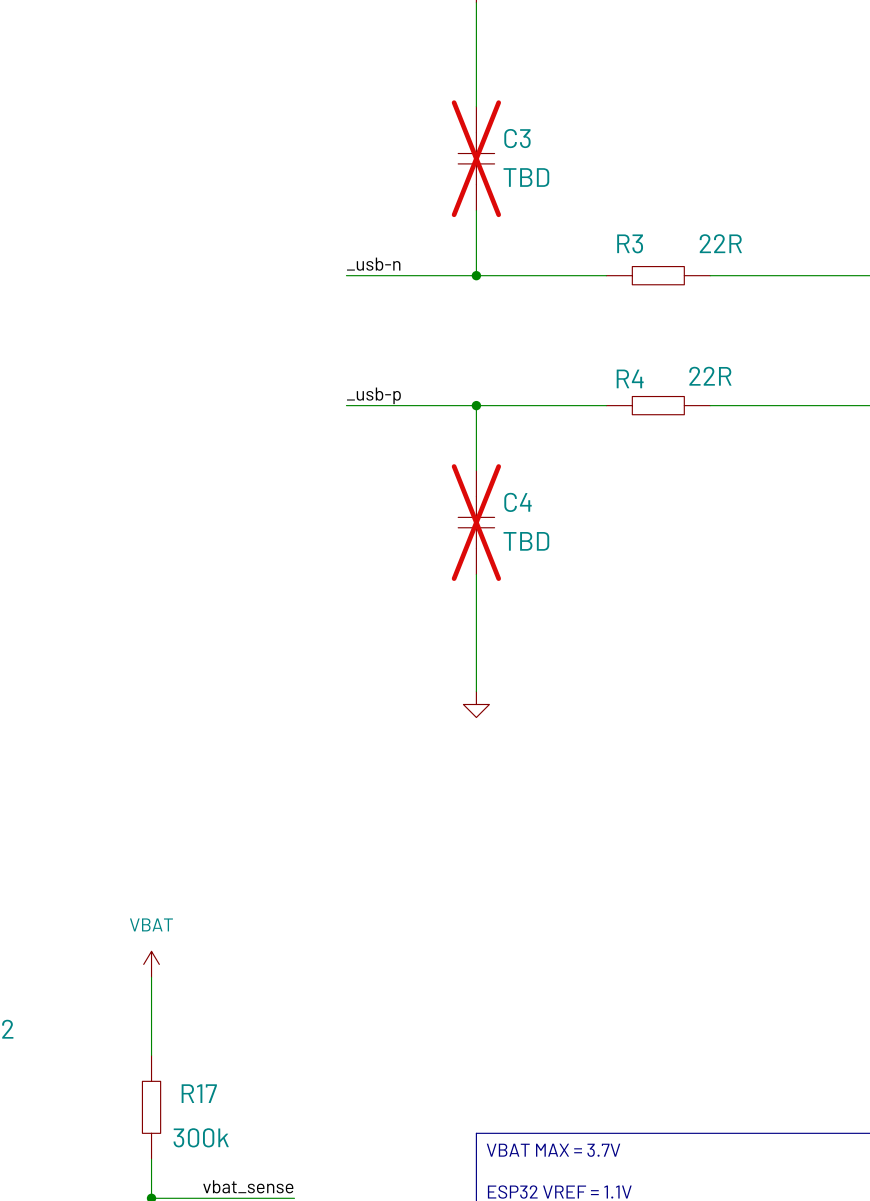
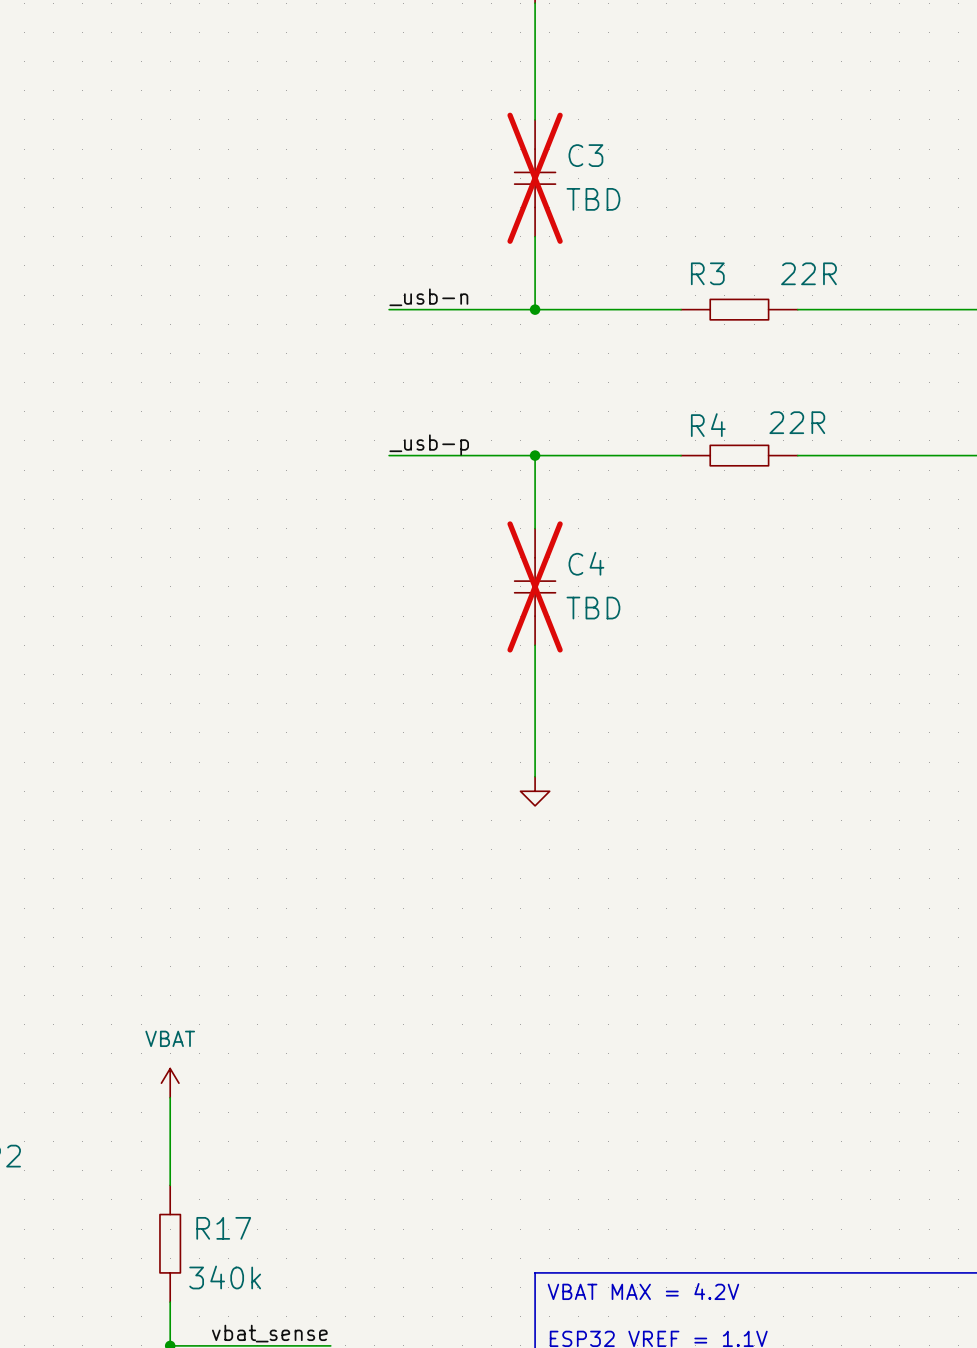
R17 value: 300k (201, 1137) -> 340k (225, 1277)
text: VBAT MAX = 3.7V (553, 1150) -> VBAT MAX = 4.2V (643, 1291)

